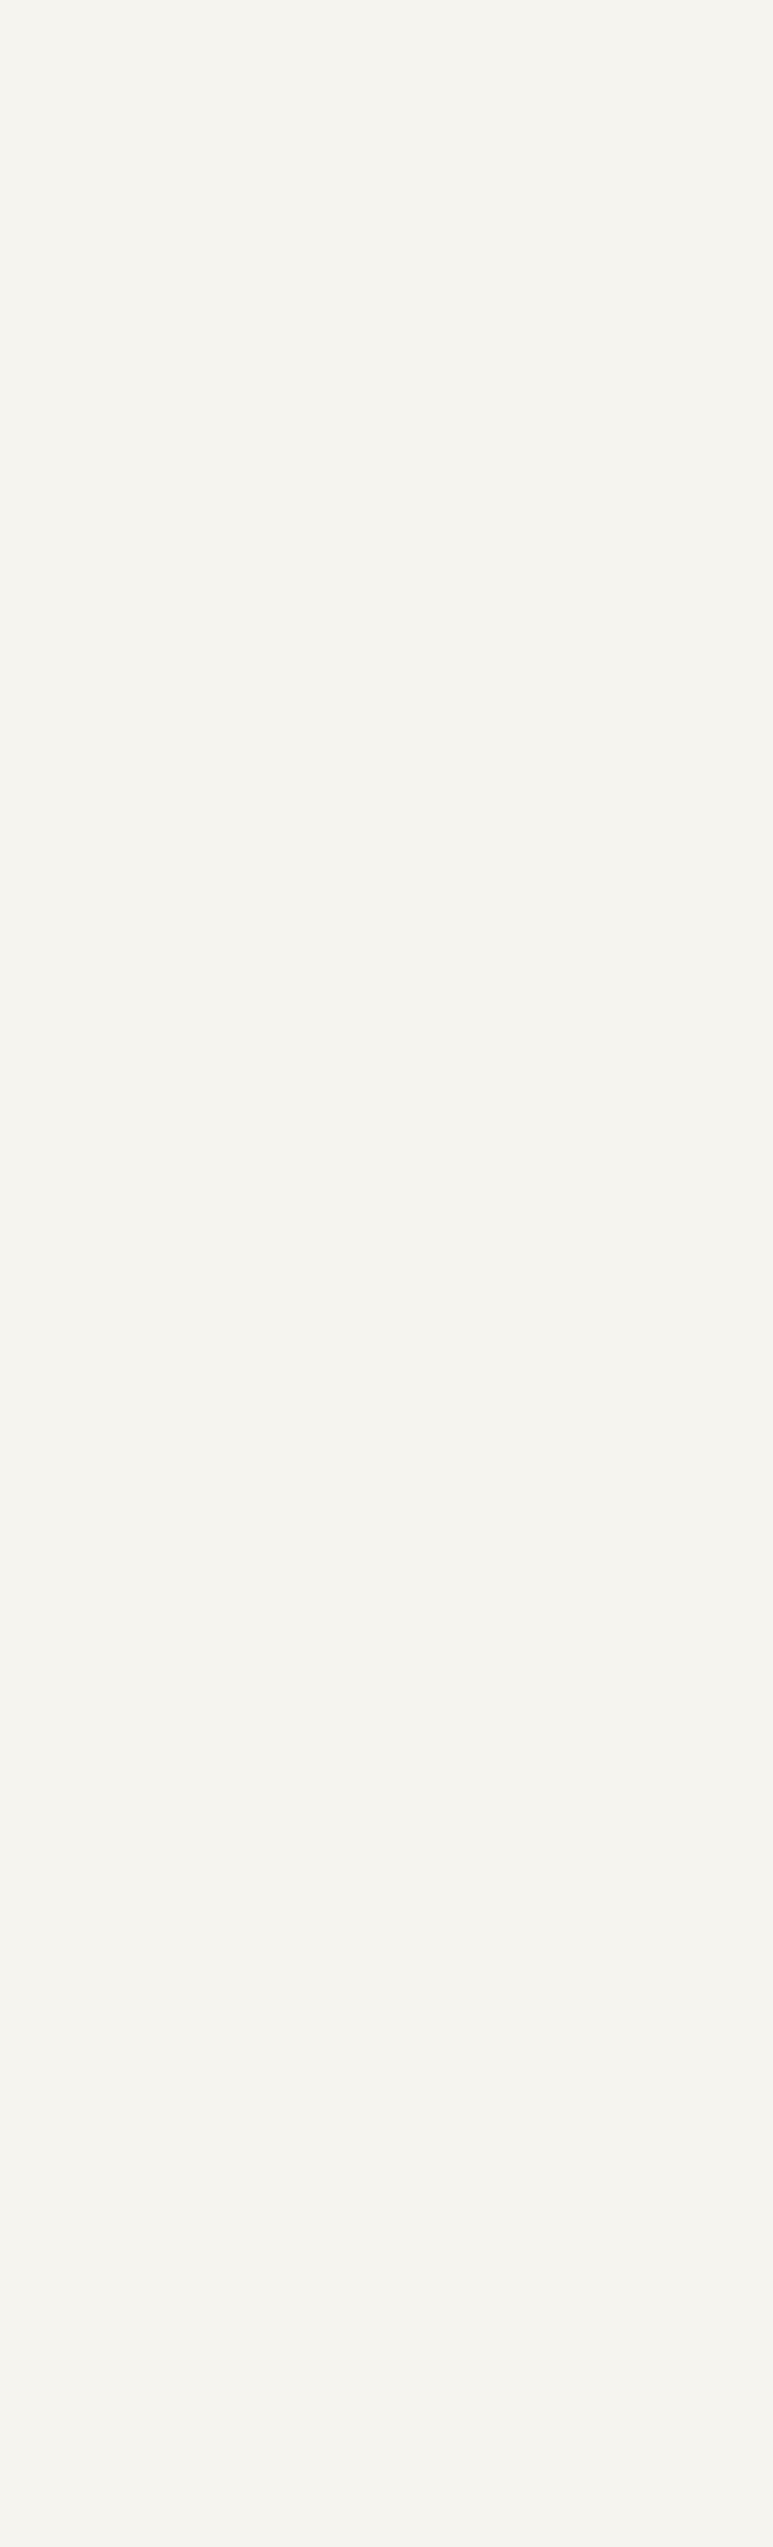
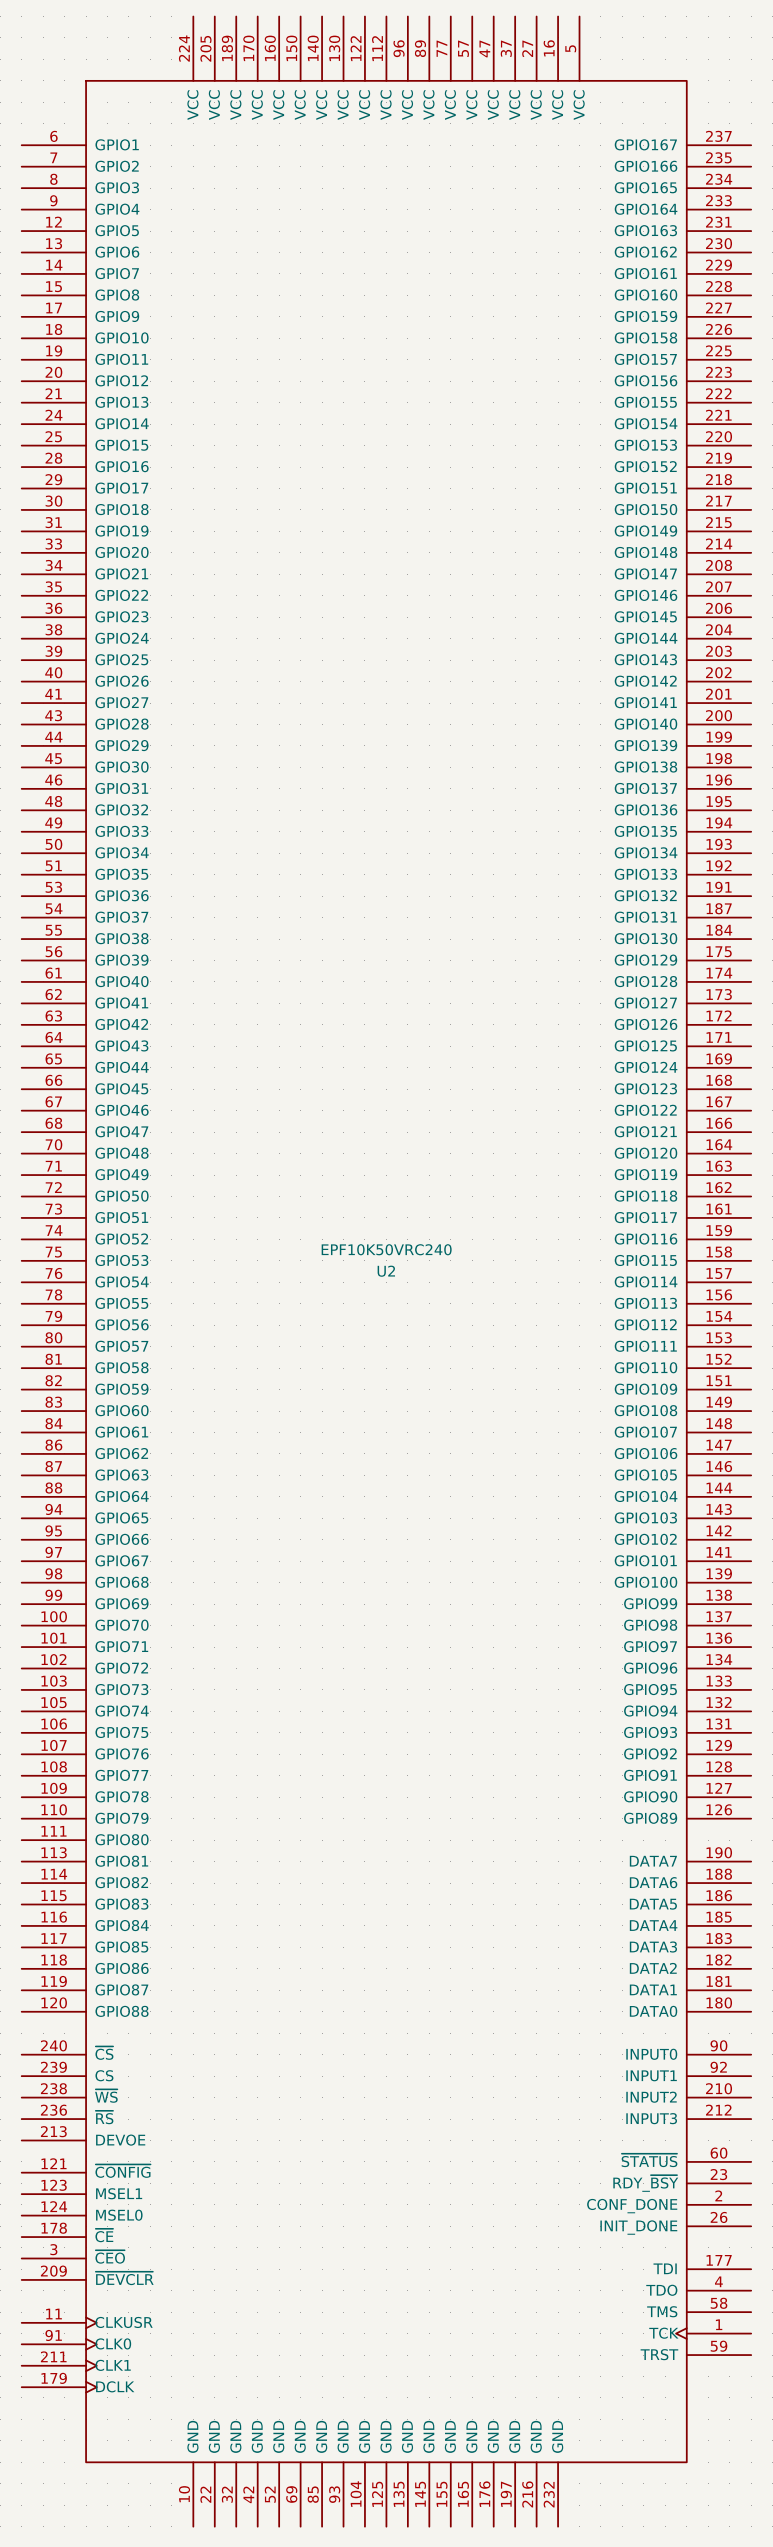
U2: none -> EPF10K50VRC240 (386, 1271)

